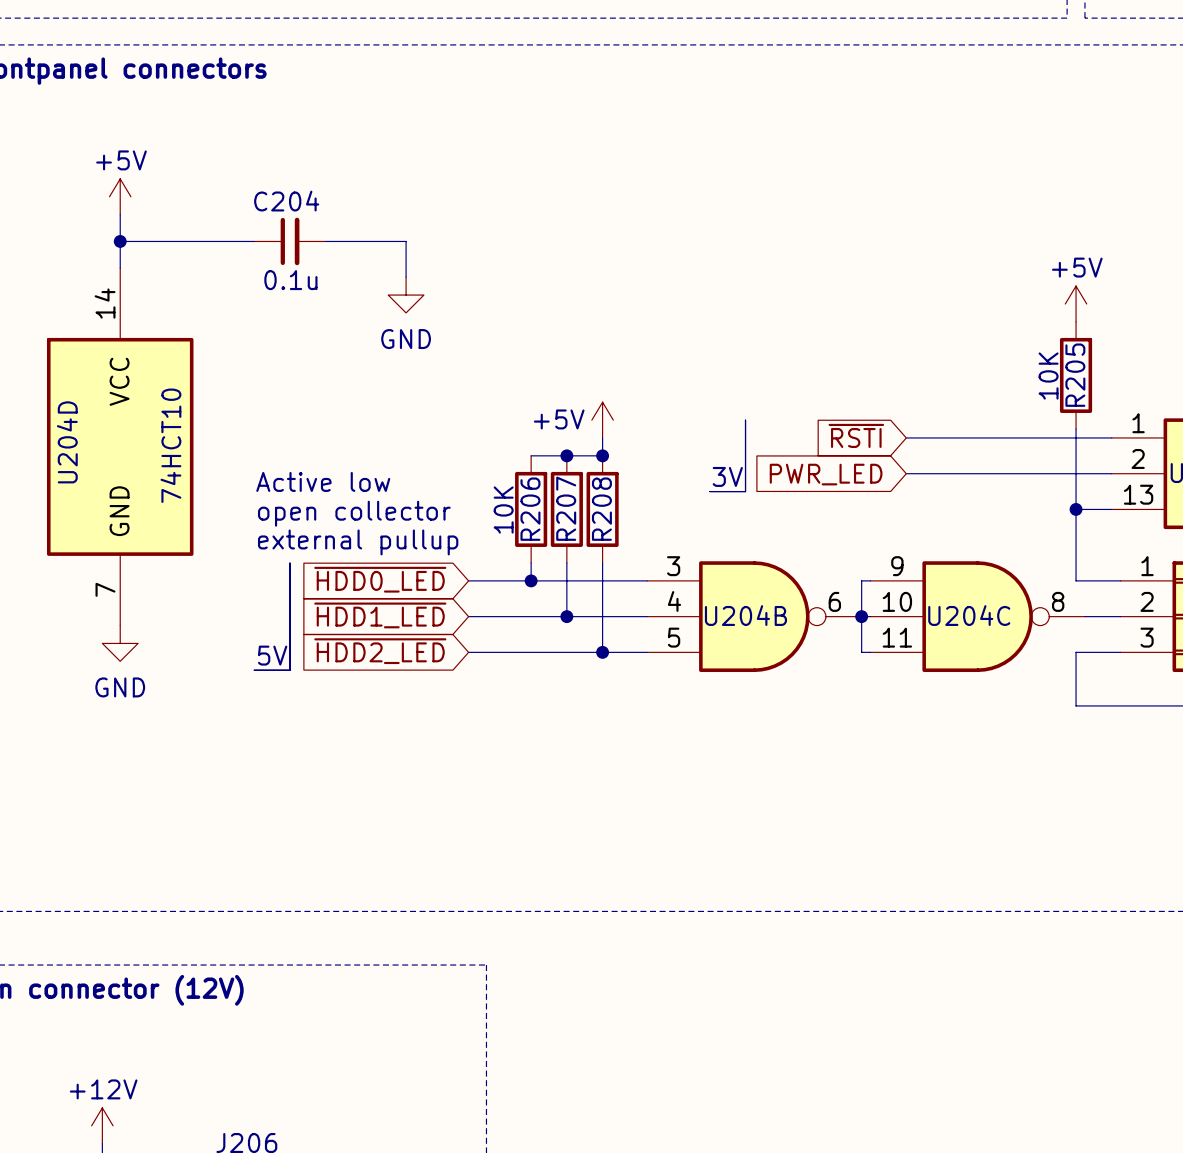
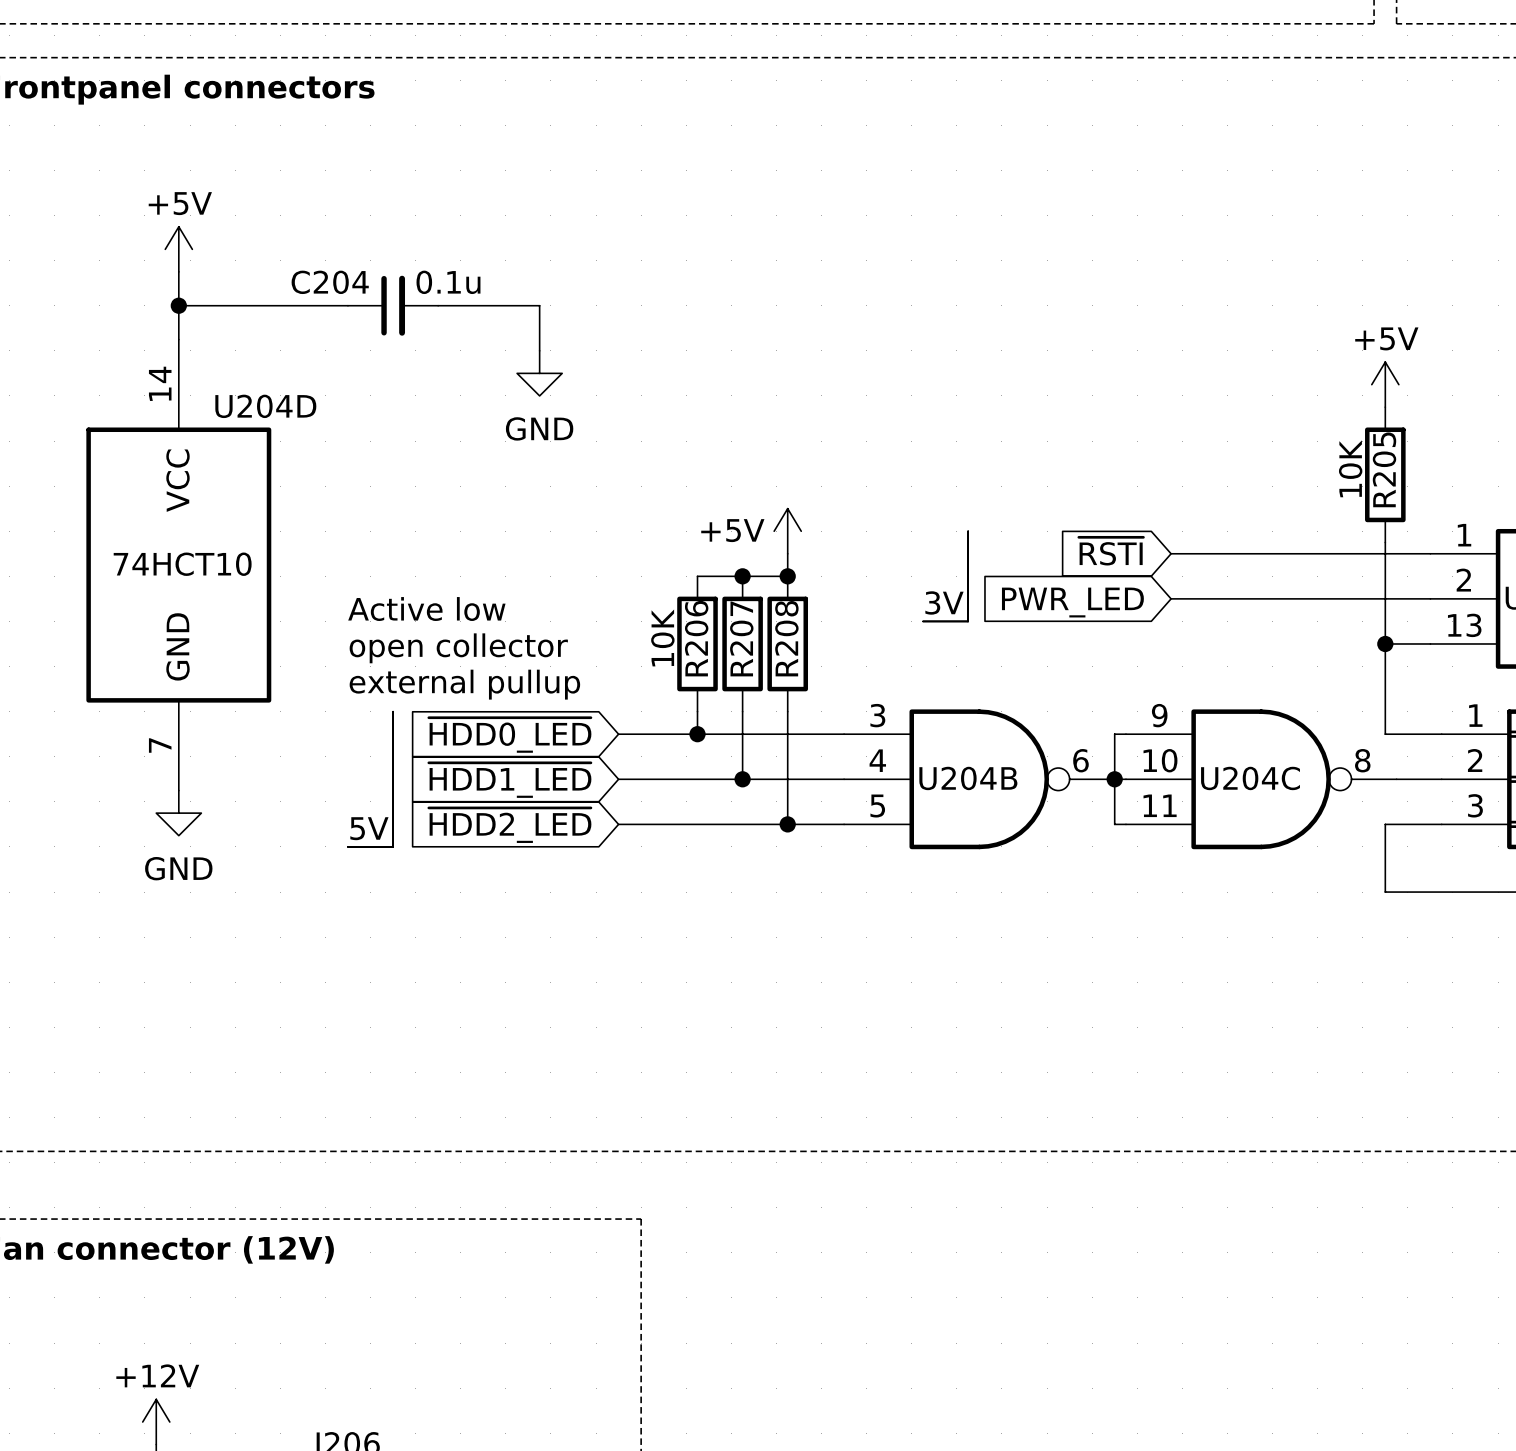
C204 name position: C204 (286, 201) -> C204 (330, 282)
C204 value position: 0.1u (290, 280) -> 0.1u (448, 282)
U204D name rotation: 0° (67, 442) -> 90° clockwise (265, 406)
U204D name position: U204D (67, 442) -> U204D (265, 406)
U204D value rotation: 0° (170, 445) -> 90° clockwise (182, 564)

